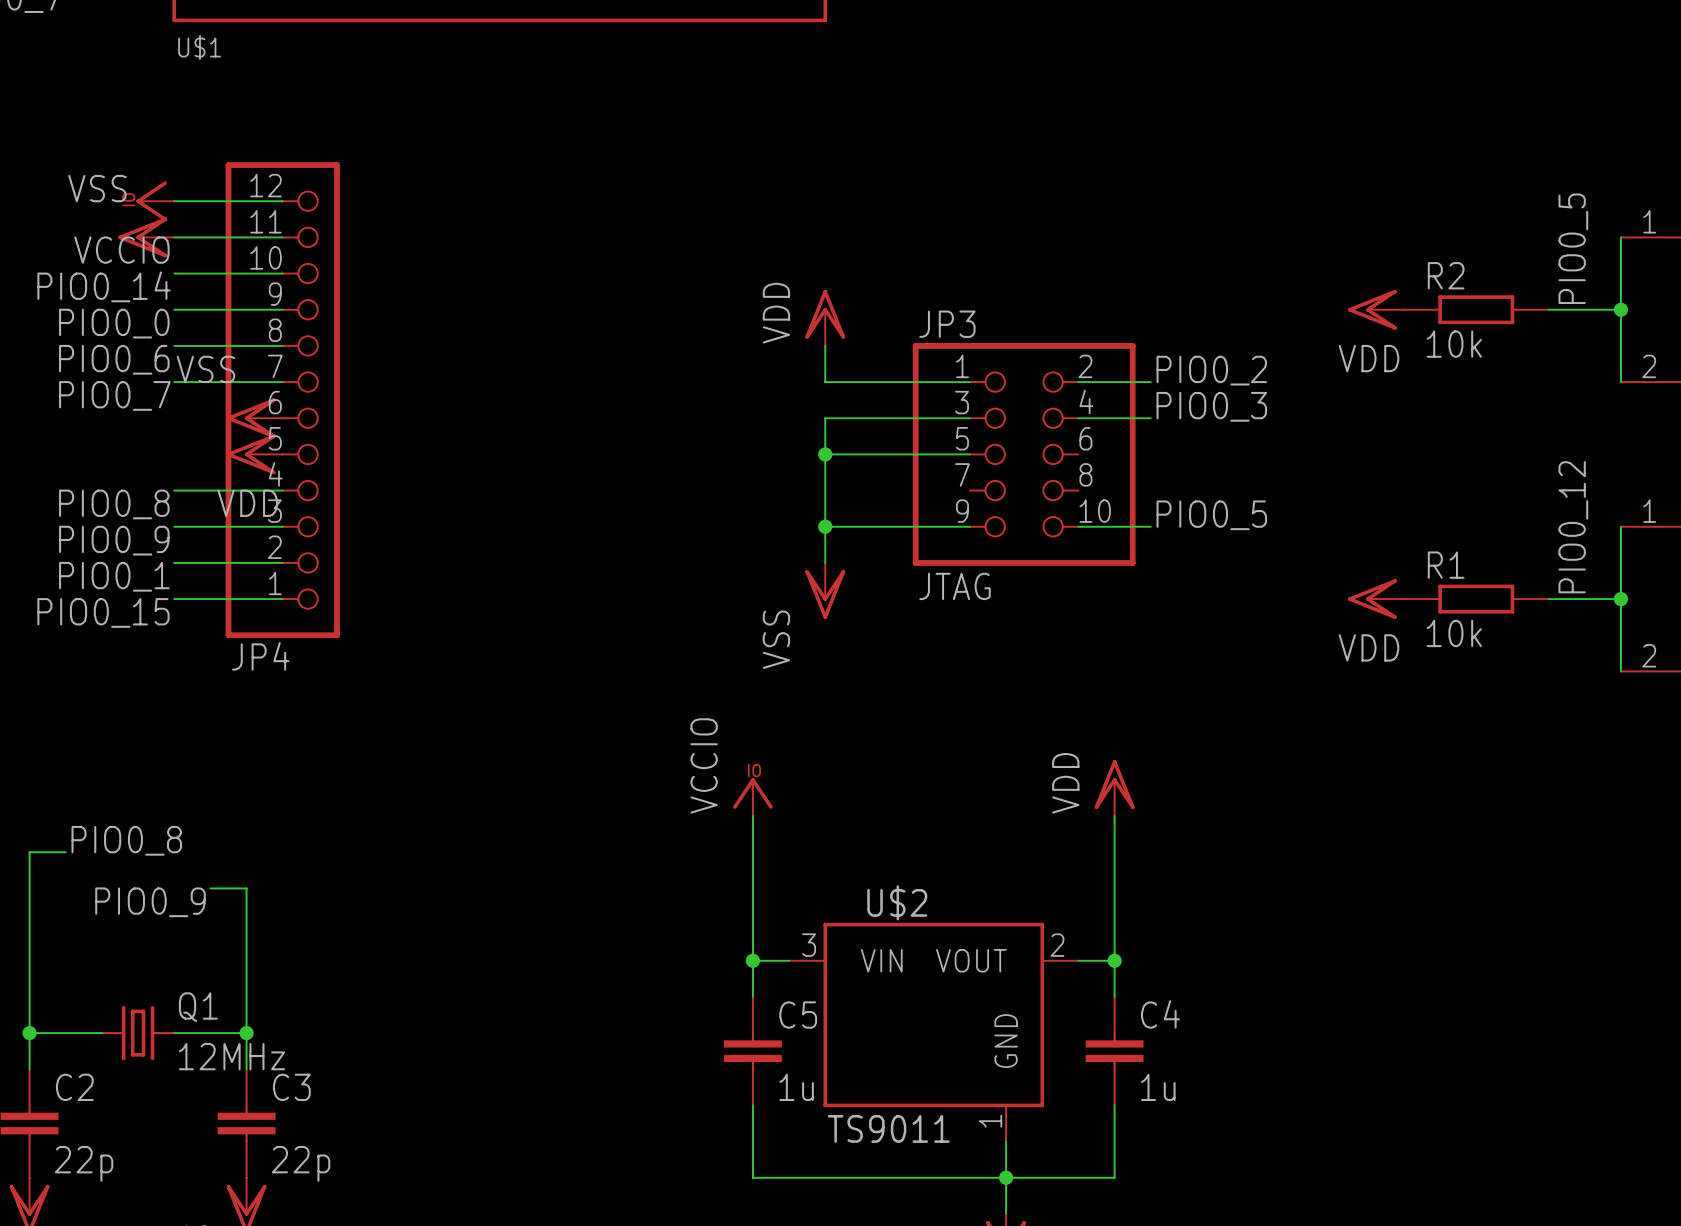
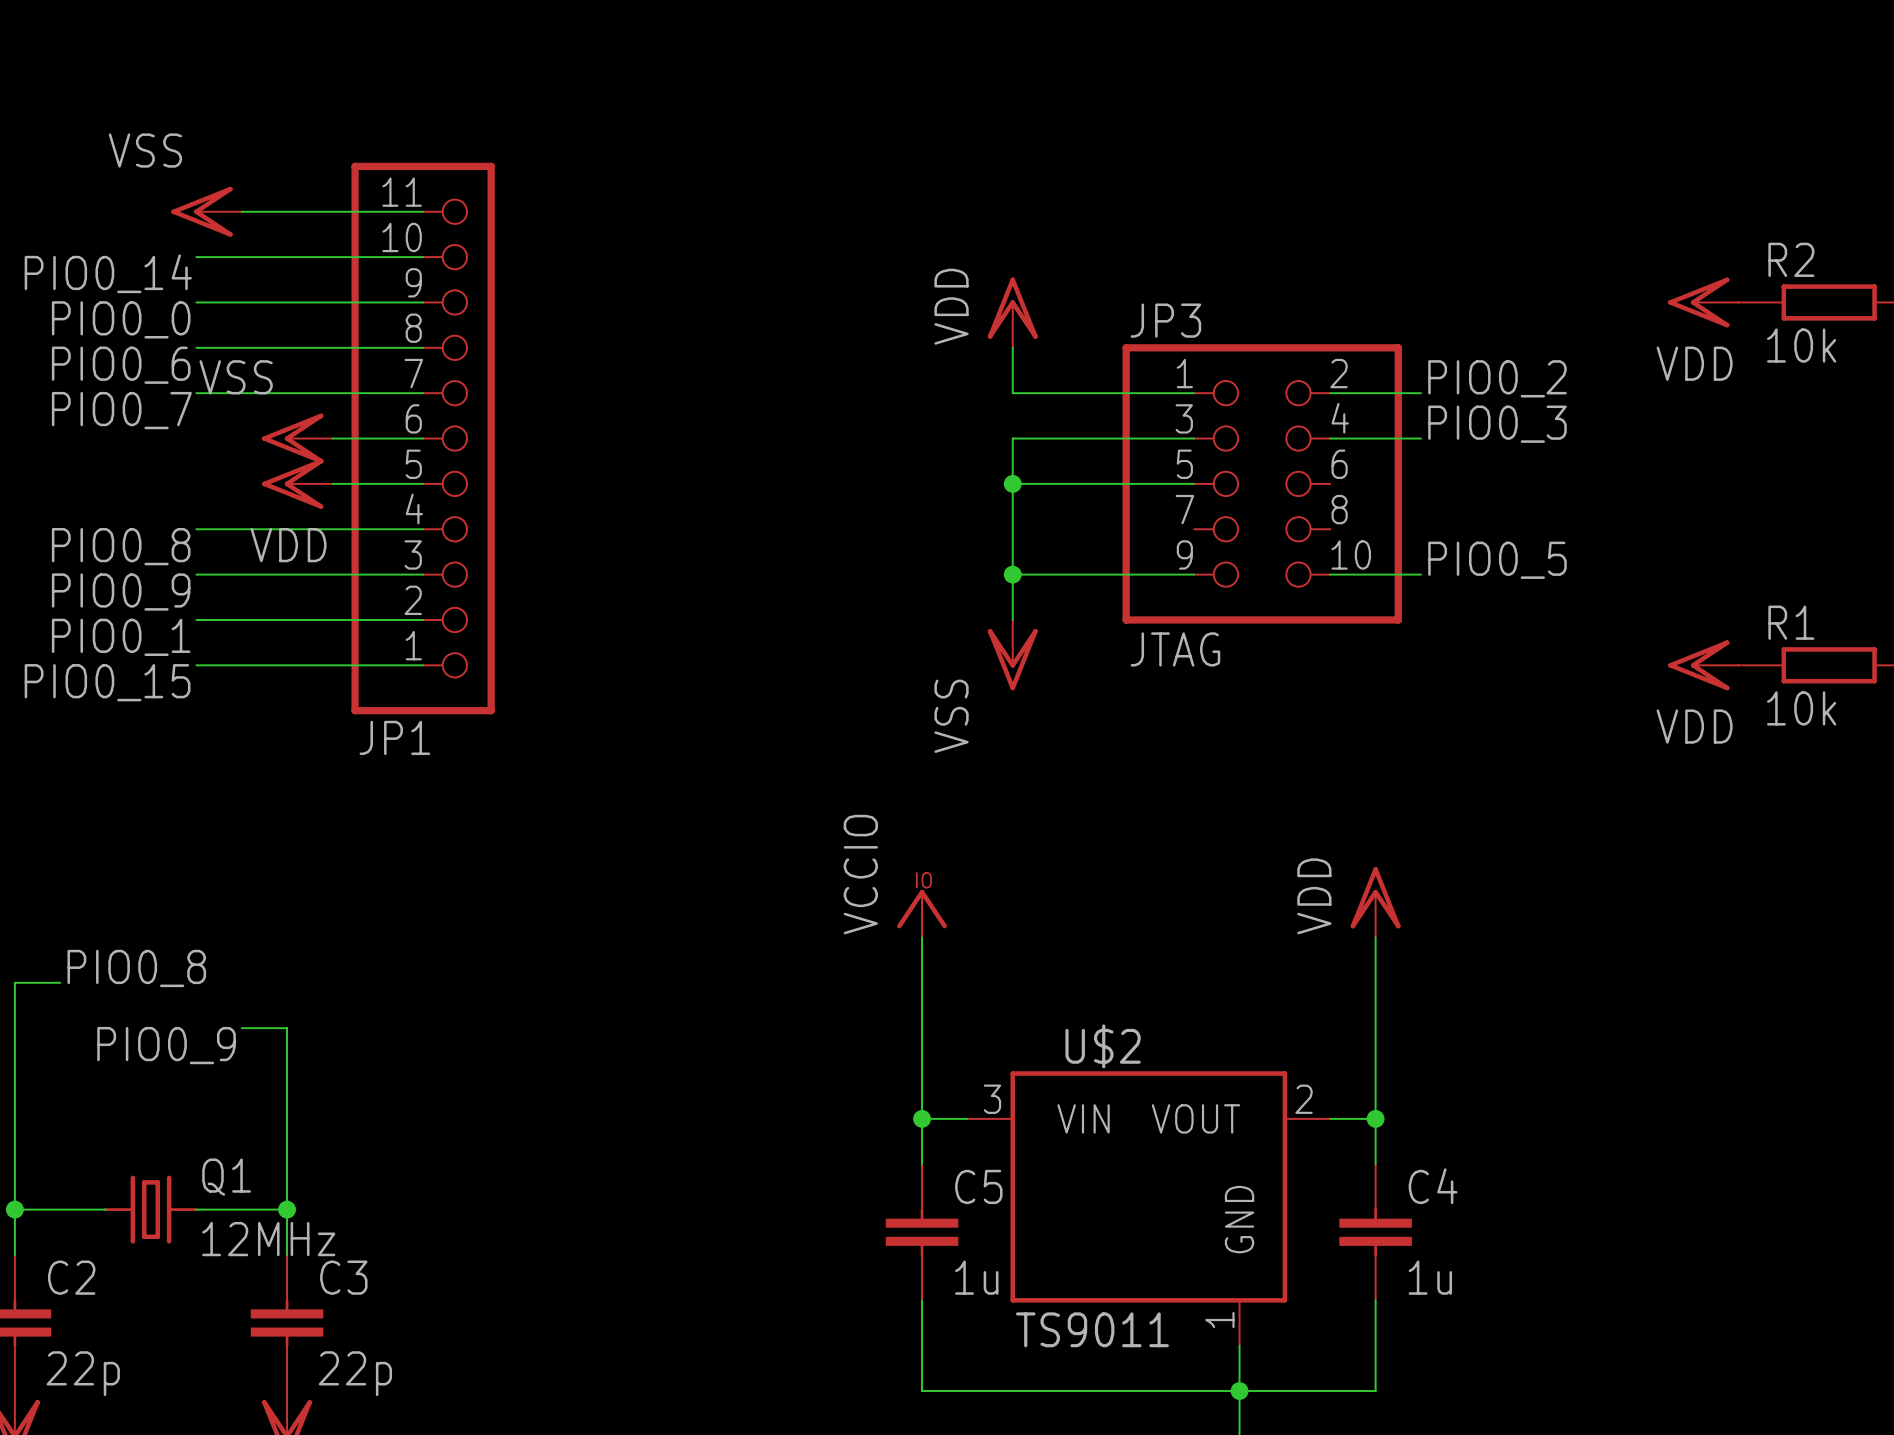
power symbol: VCCIO (155, 201) -> none
wire: (174, 201) (282, 201) -> none
power symbol position: VSS (146, 237) -> VSS (206, 211)
wire: none -> (332, 211) (423, 211)
wire: none -> (332, 257) (423, 257)
wire: none -> (332, 302) (423, 302)
wire: none -> (332, 347) (423, 347)
wire: none -> (332, 393) (423, 393)
JP4: (282, 400) -> none
wire: none -> (332, 438) (423, 438)
JP1: none -> (423, 438)
wire: none -> (332, 483) (423, 483)
wire: none -> (332, 529) (423, 529)
wire: none -> (332, 574) (423, 574)
wire: none -> (332, 619) (423, 619)
wire: none -> (332, 665) (423, 665)

